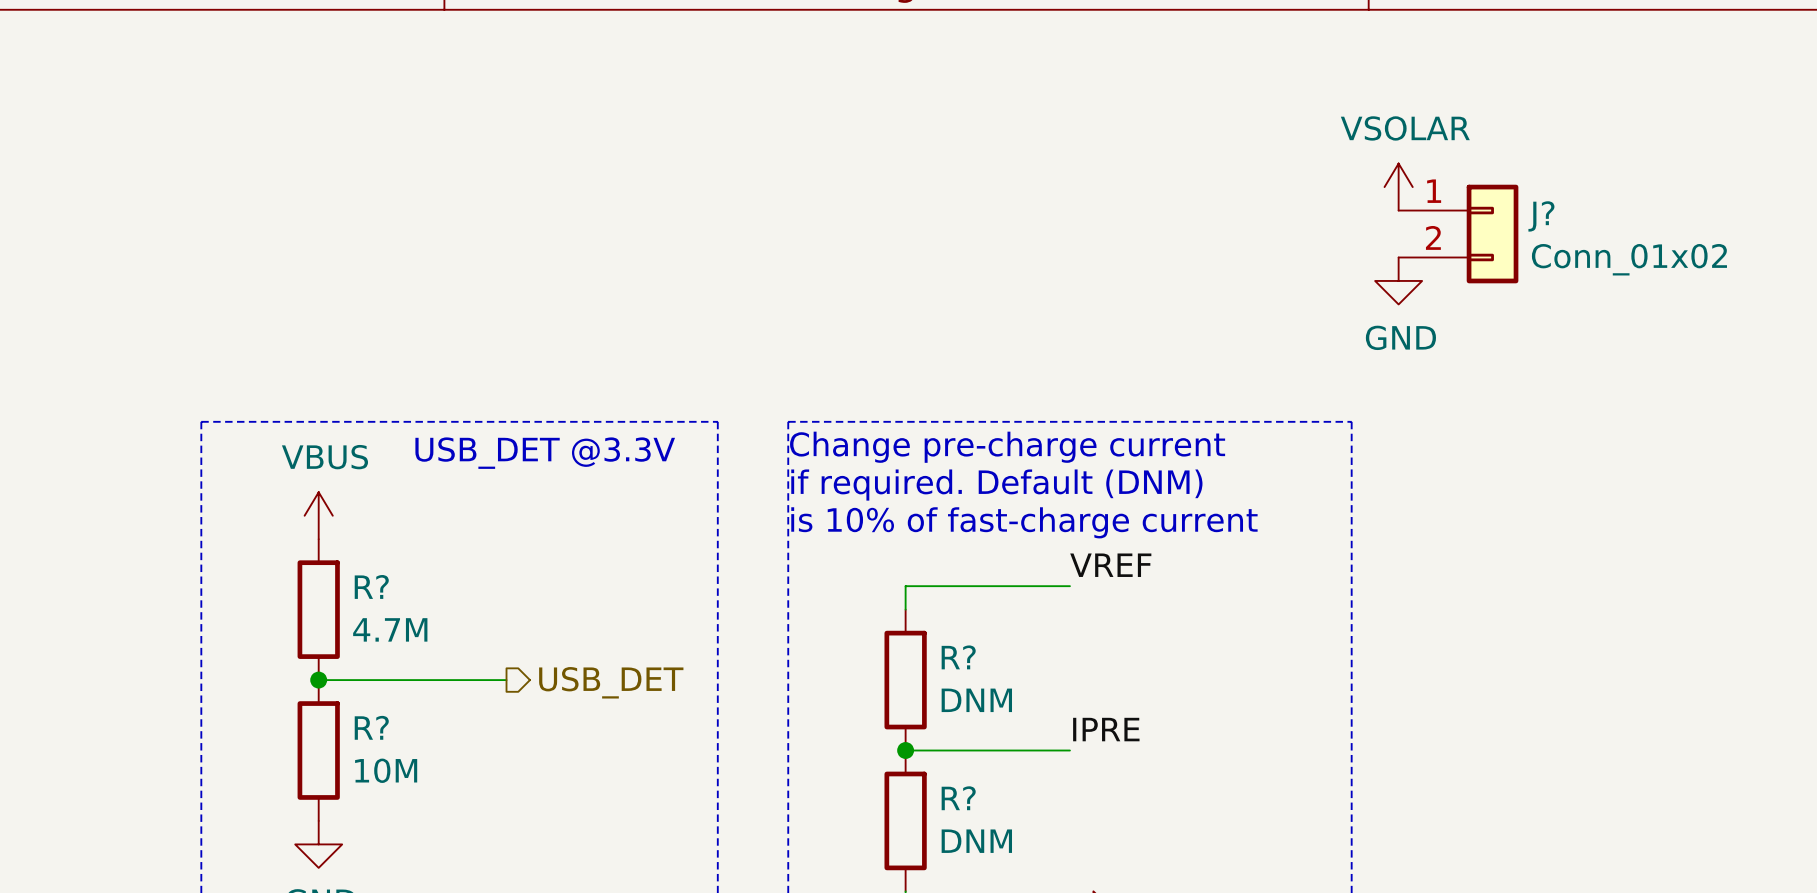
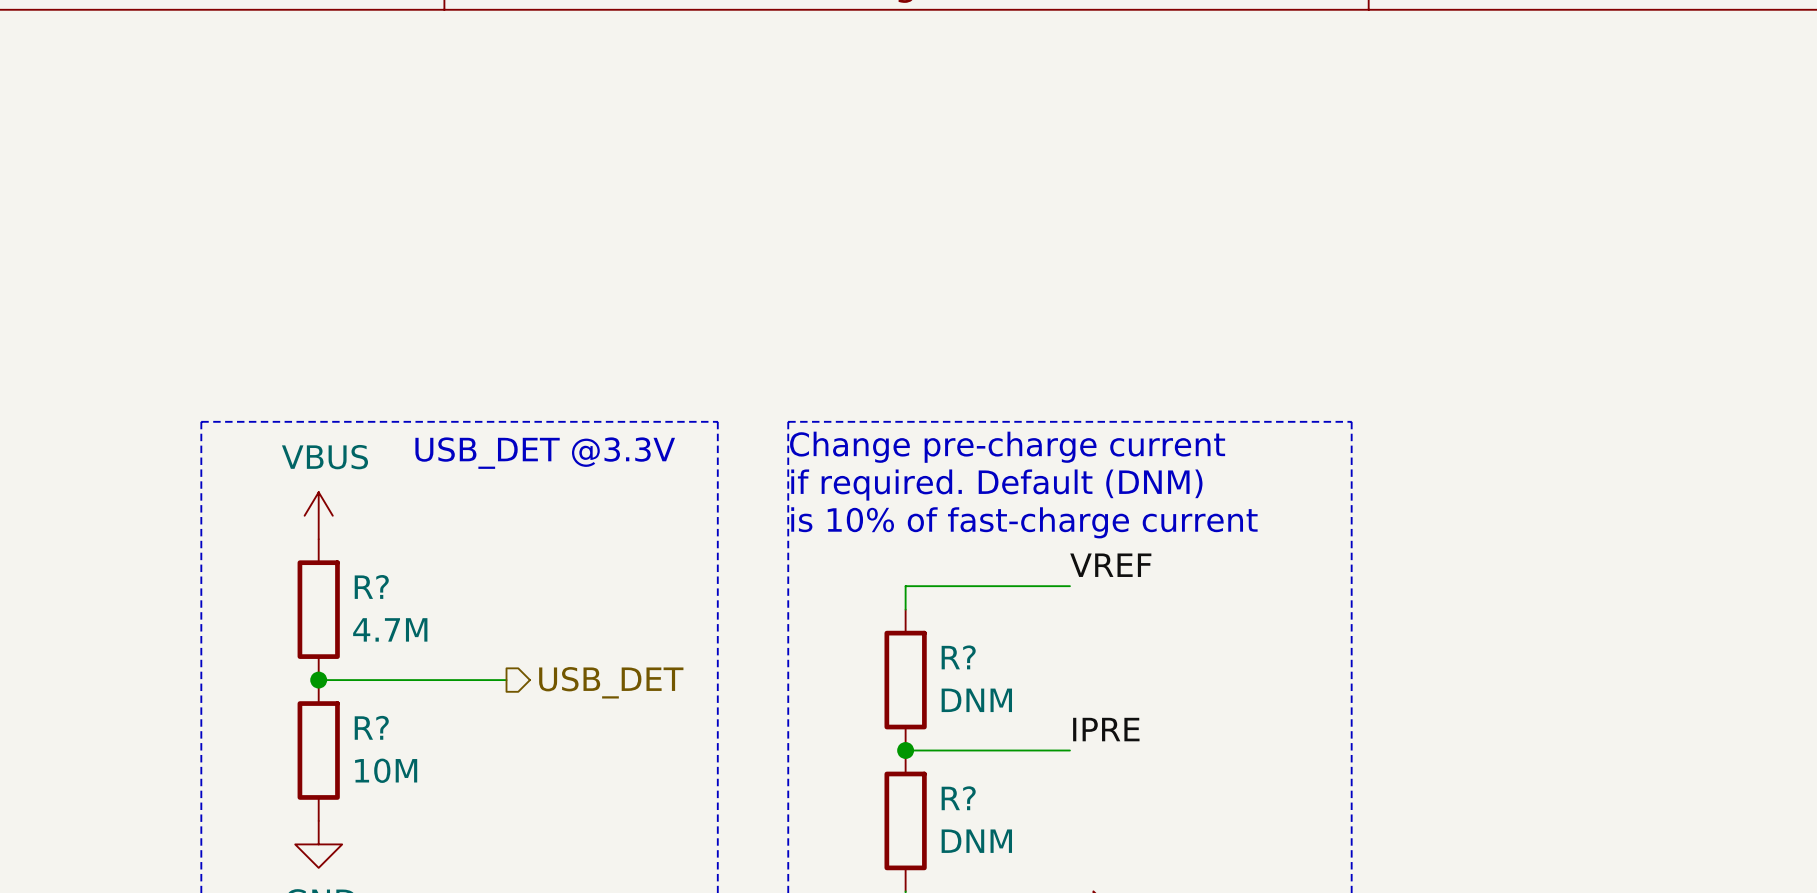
power symbol: VSOLAR (1398, 187) -> none
J?: Conn_01x02 (1458, 234) -> none
power symbol: GND (1398, 280) -> none

